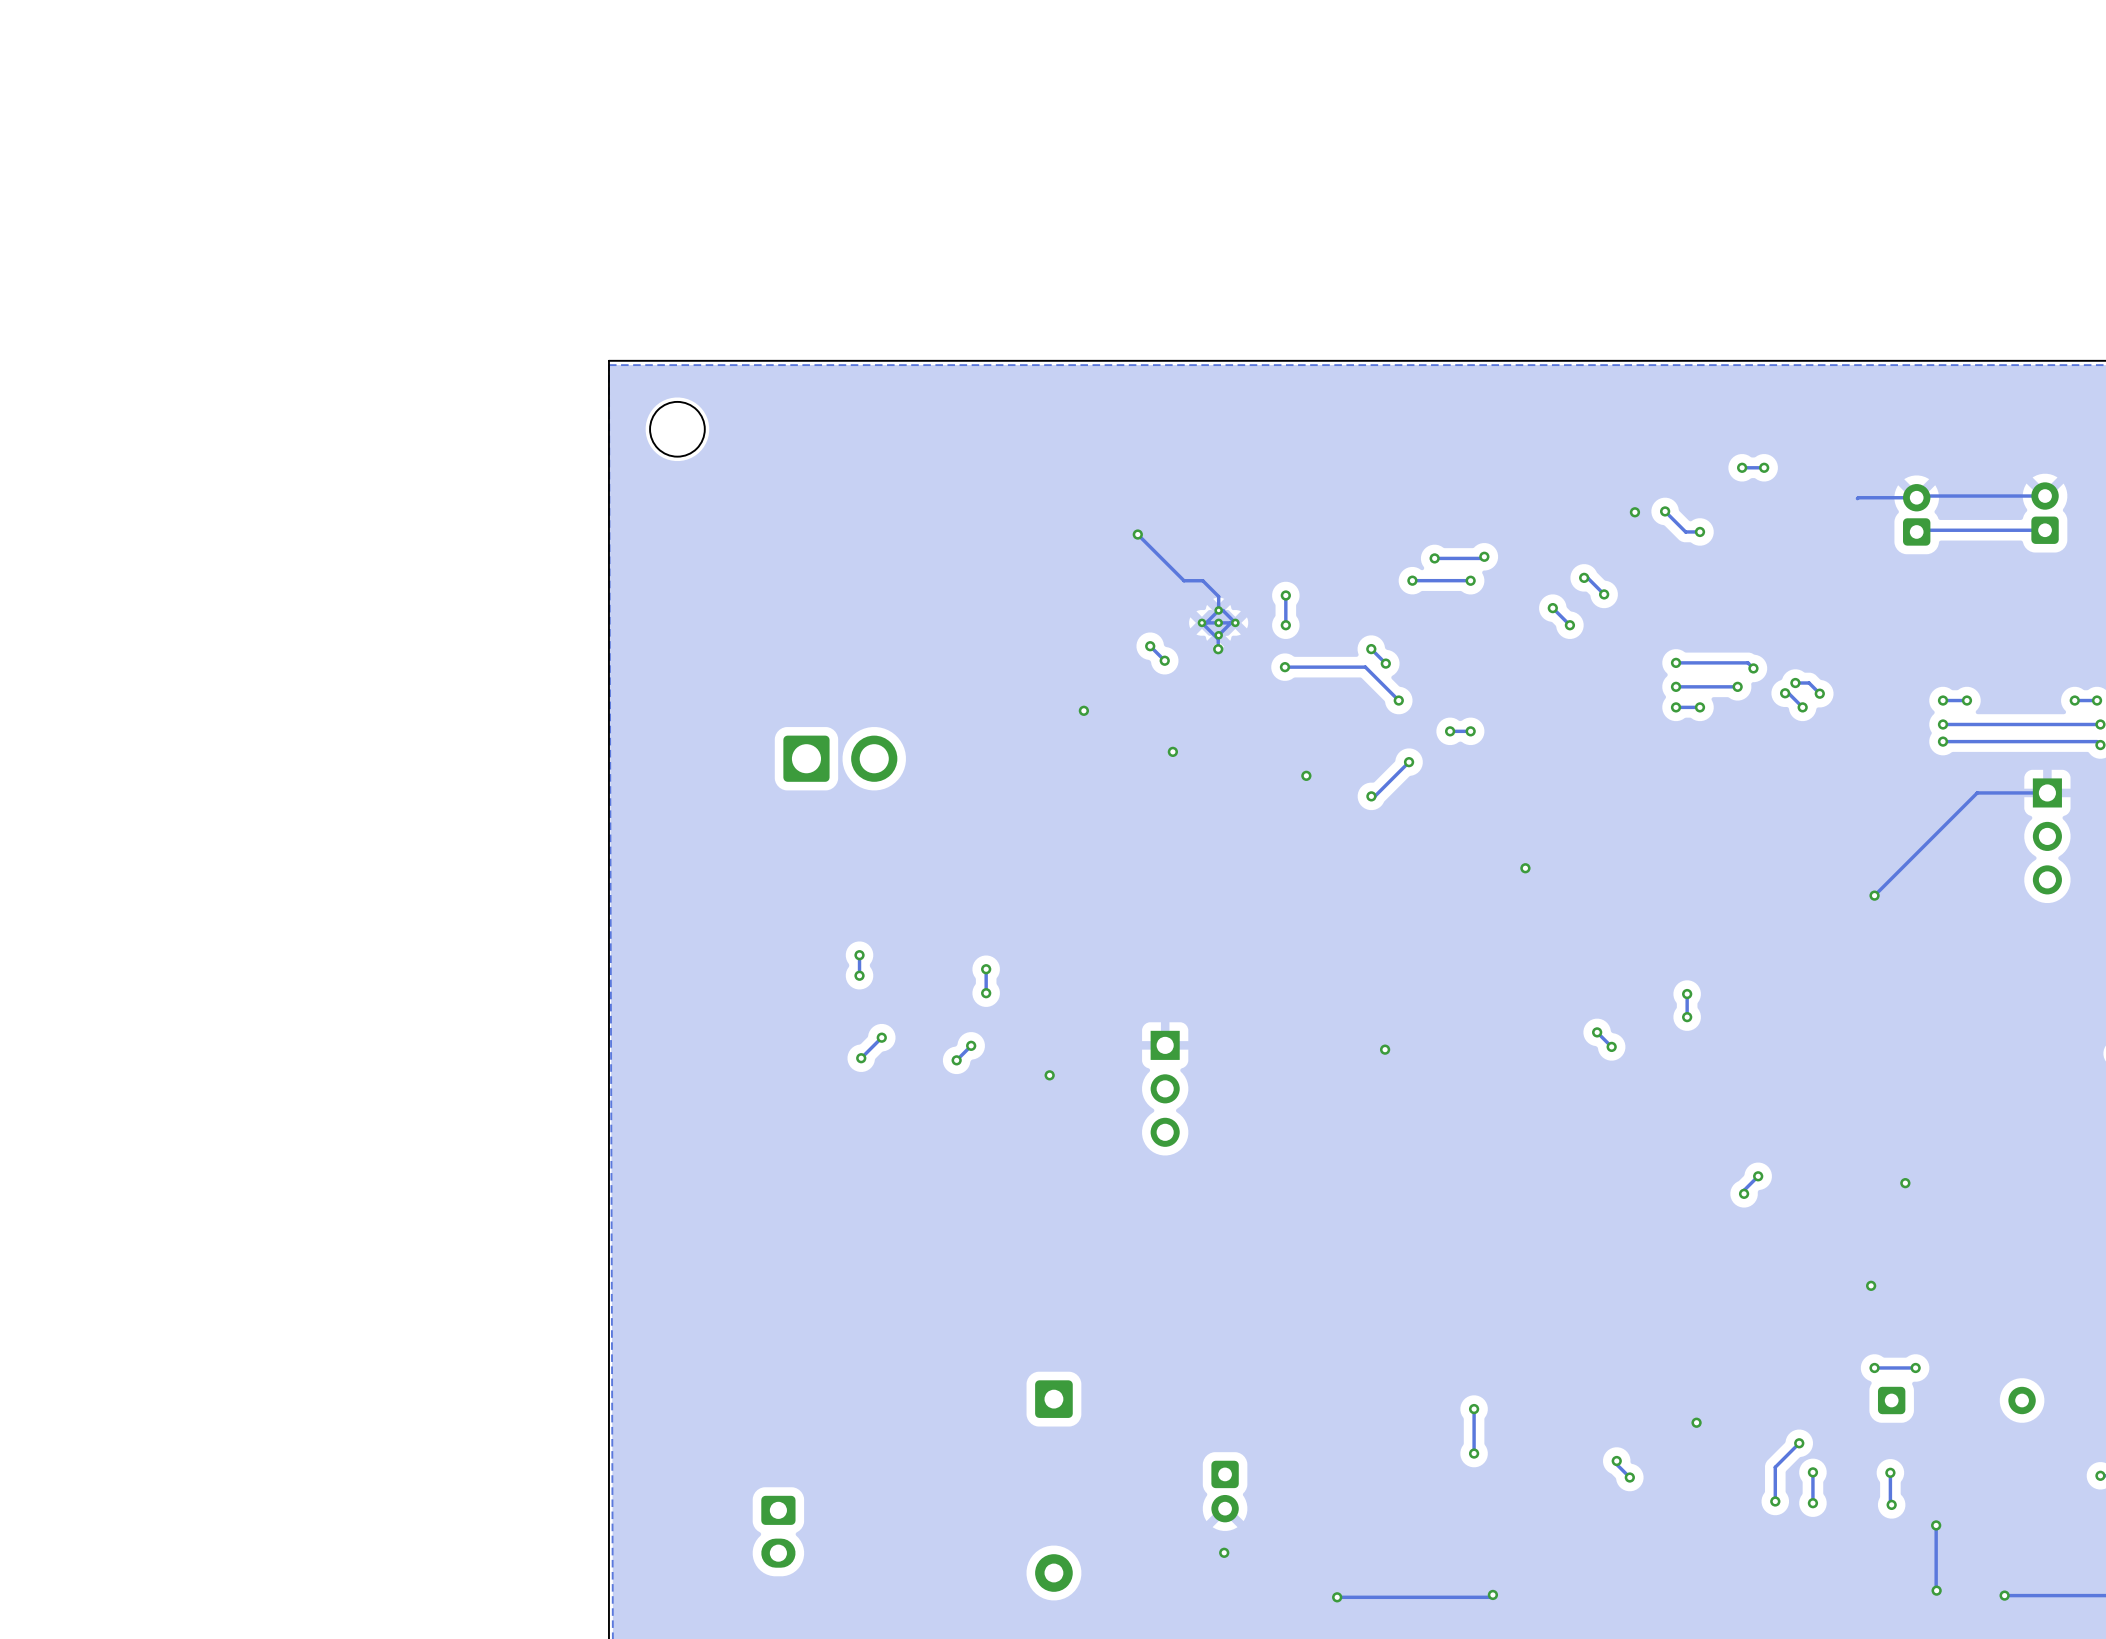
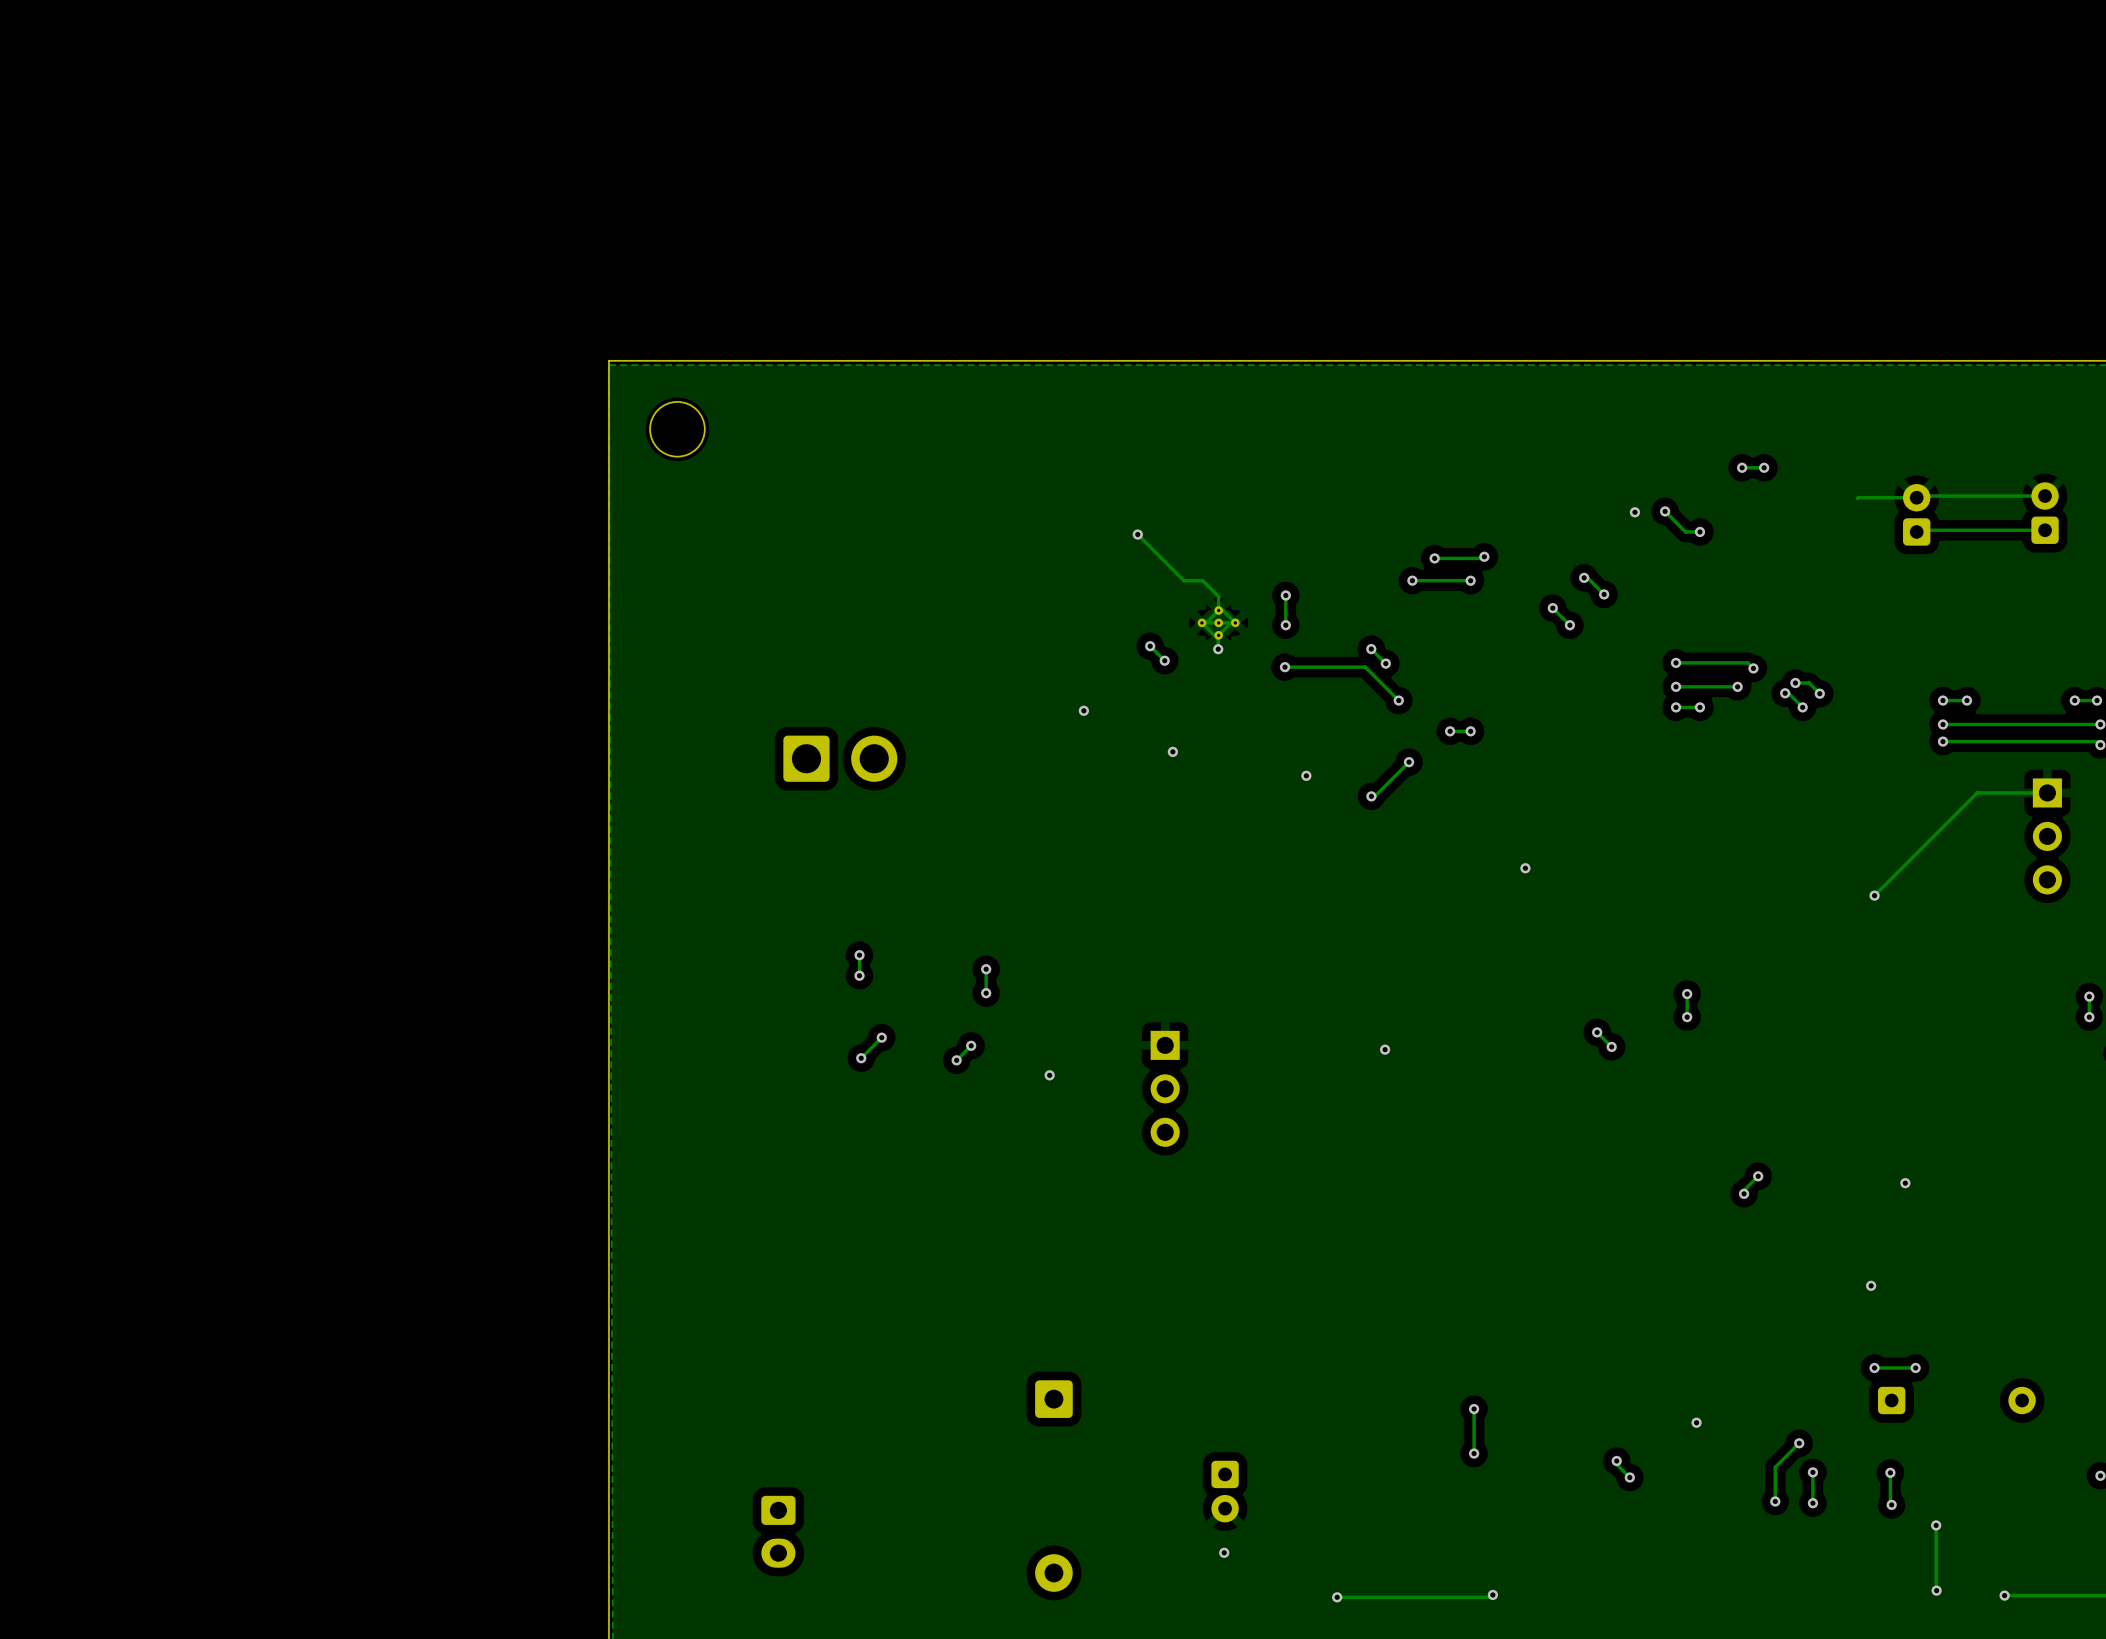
track: none -> (2089, 996) (2089, 1017)
via: none -> (2089, 996)
via: none -> (2089, 1017)

